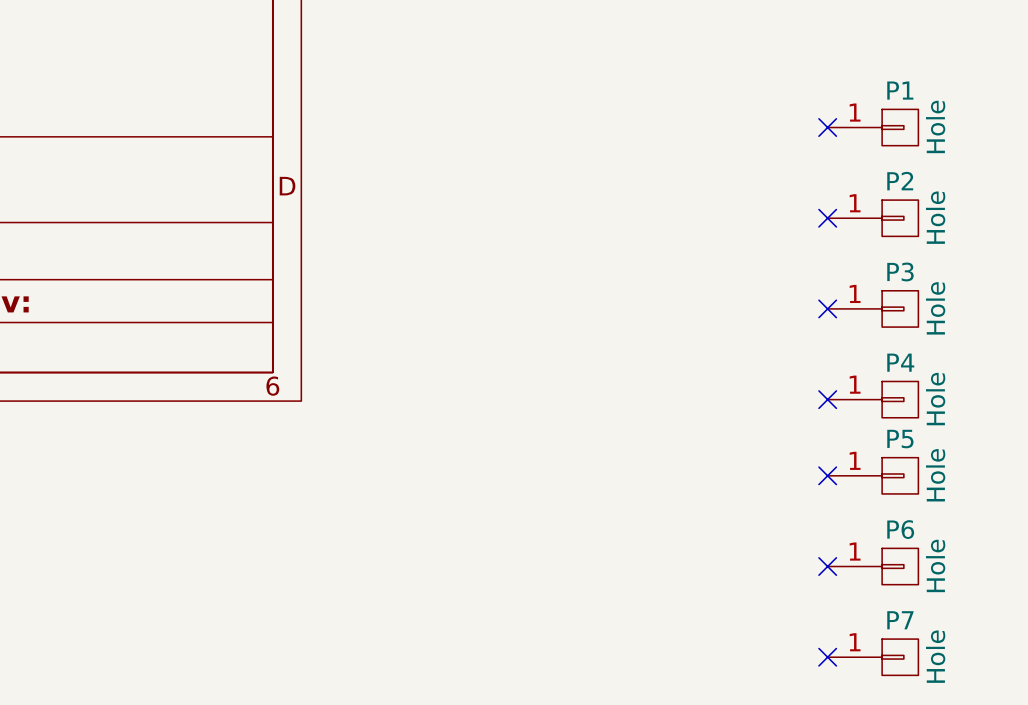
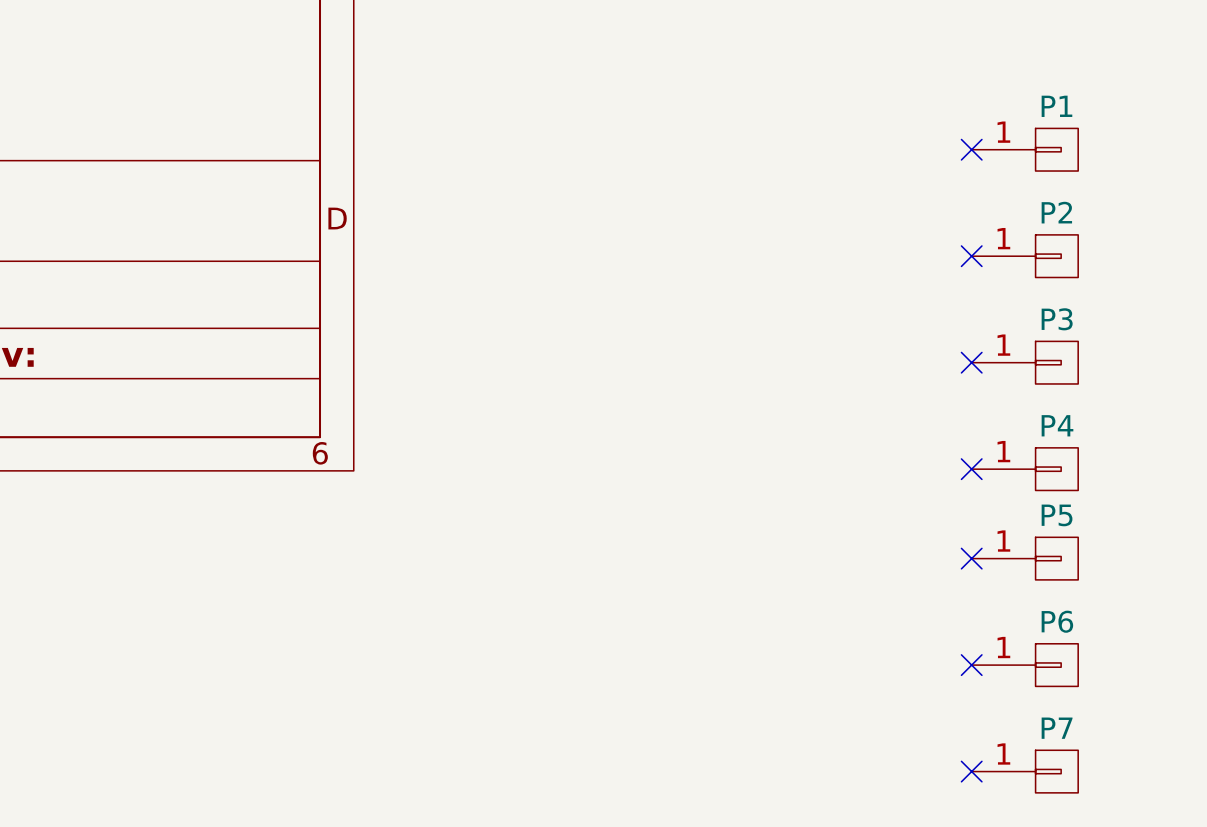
P1 value: Hole (935, 126) -> none
P2 value: Hole (935, 217) -> none
P3 value: Hole (935, 308) -> none
P4 value: Hole (935, 399) -> none
P5 value: Hole (935, 475) -> none
P6 value: Hole (935, 565) -> none
P7 value: Hole (935, 656) -> none

